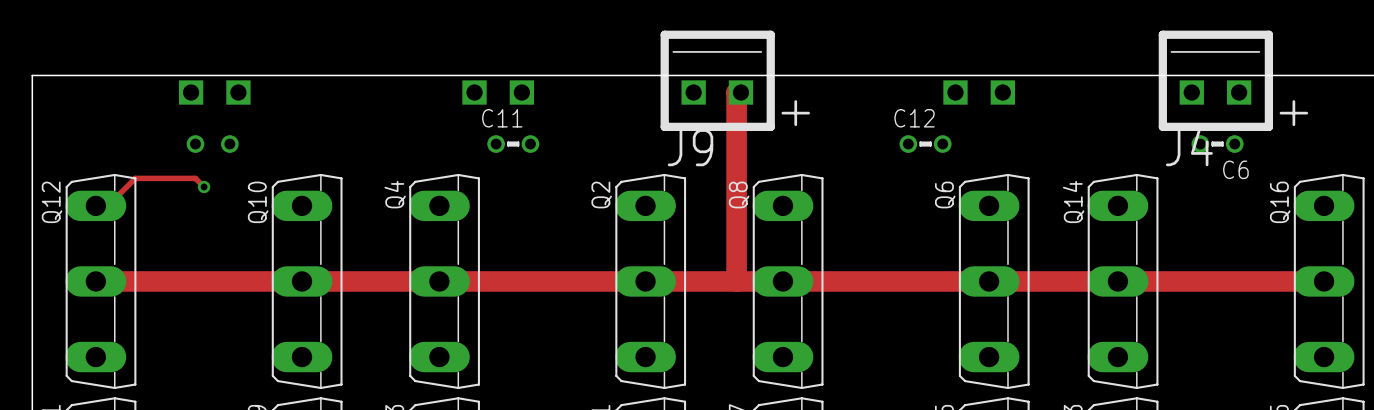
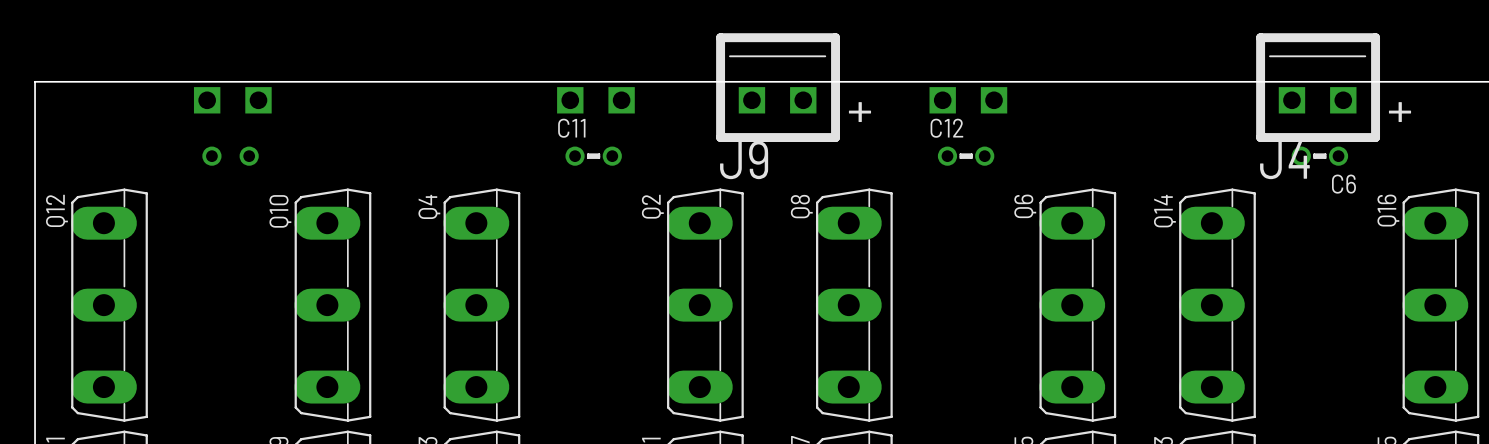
part position: (498, 92) -> (595, 100)
track: (740, 92) (736, 92) (736, 281) -> none
part position: (979, 92) -> (968, 100)
C11 position: (513, 144) -> (593, 156)
C12 position: (925, 144) -> (966, 156)
track: (204, 186) (195, 178) (135, 178) (107, 205) (95, 205) -> none
via: (204, 186) -> none
track: (95, 281) (1324, 281) -> none

